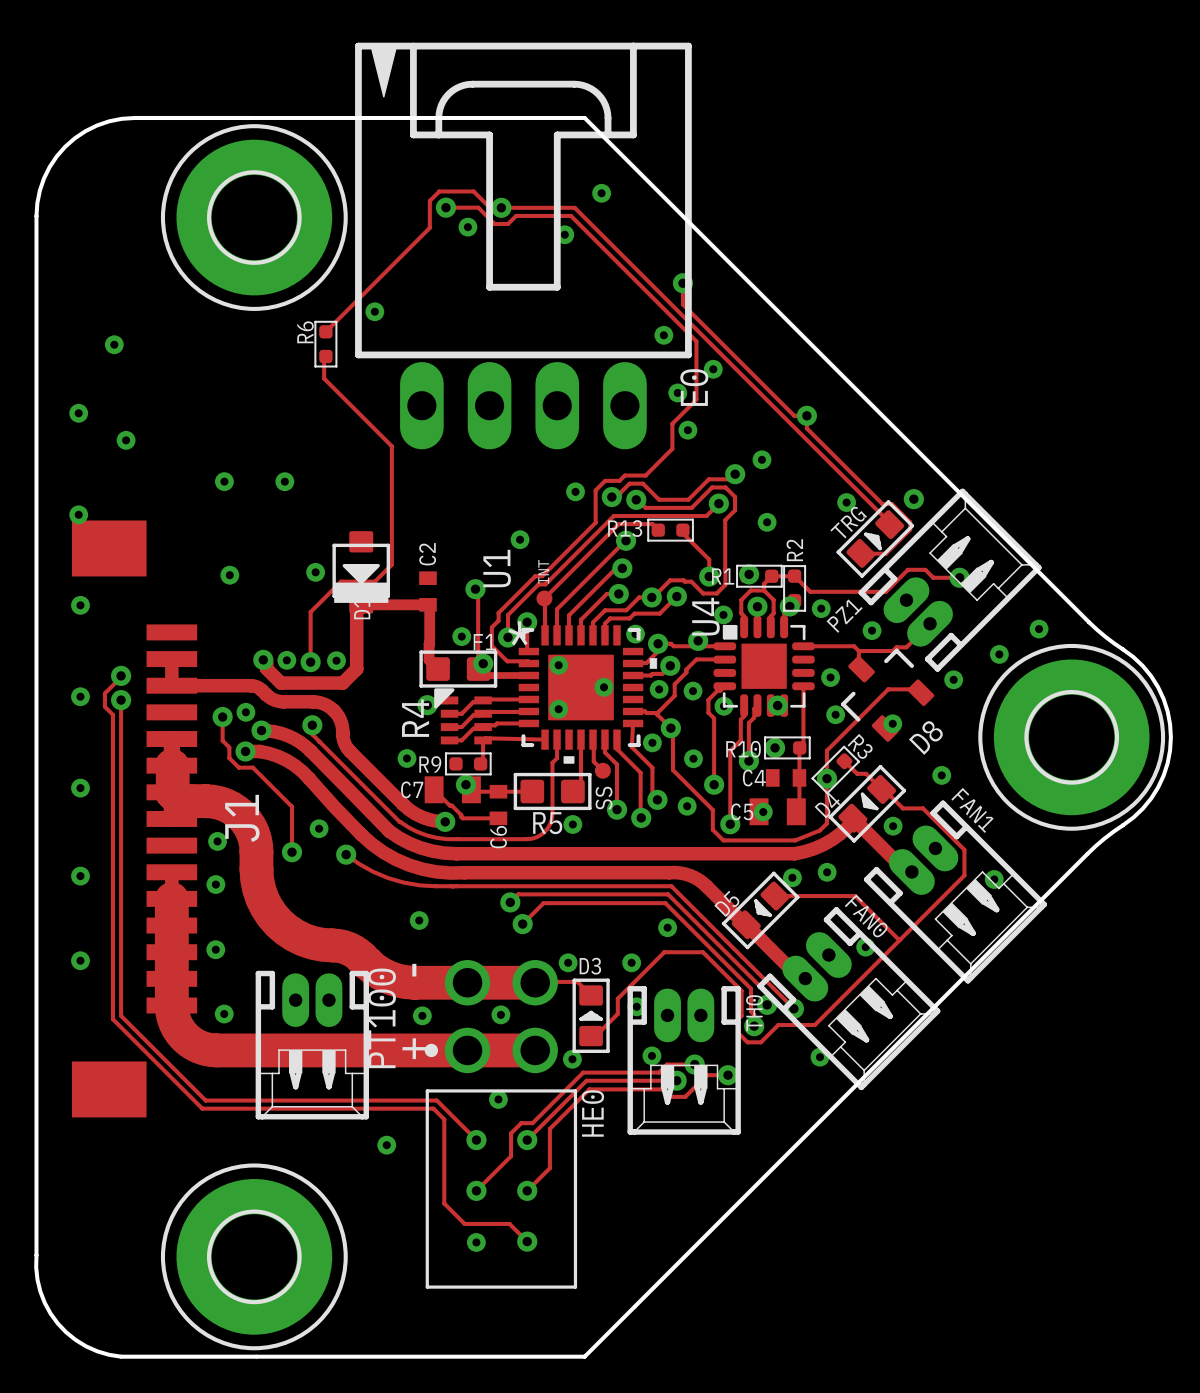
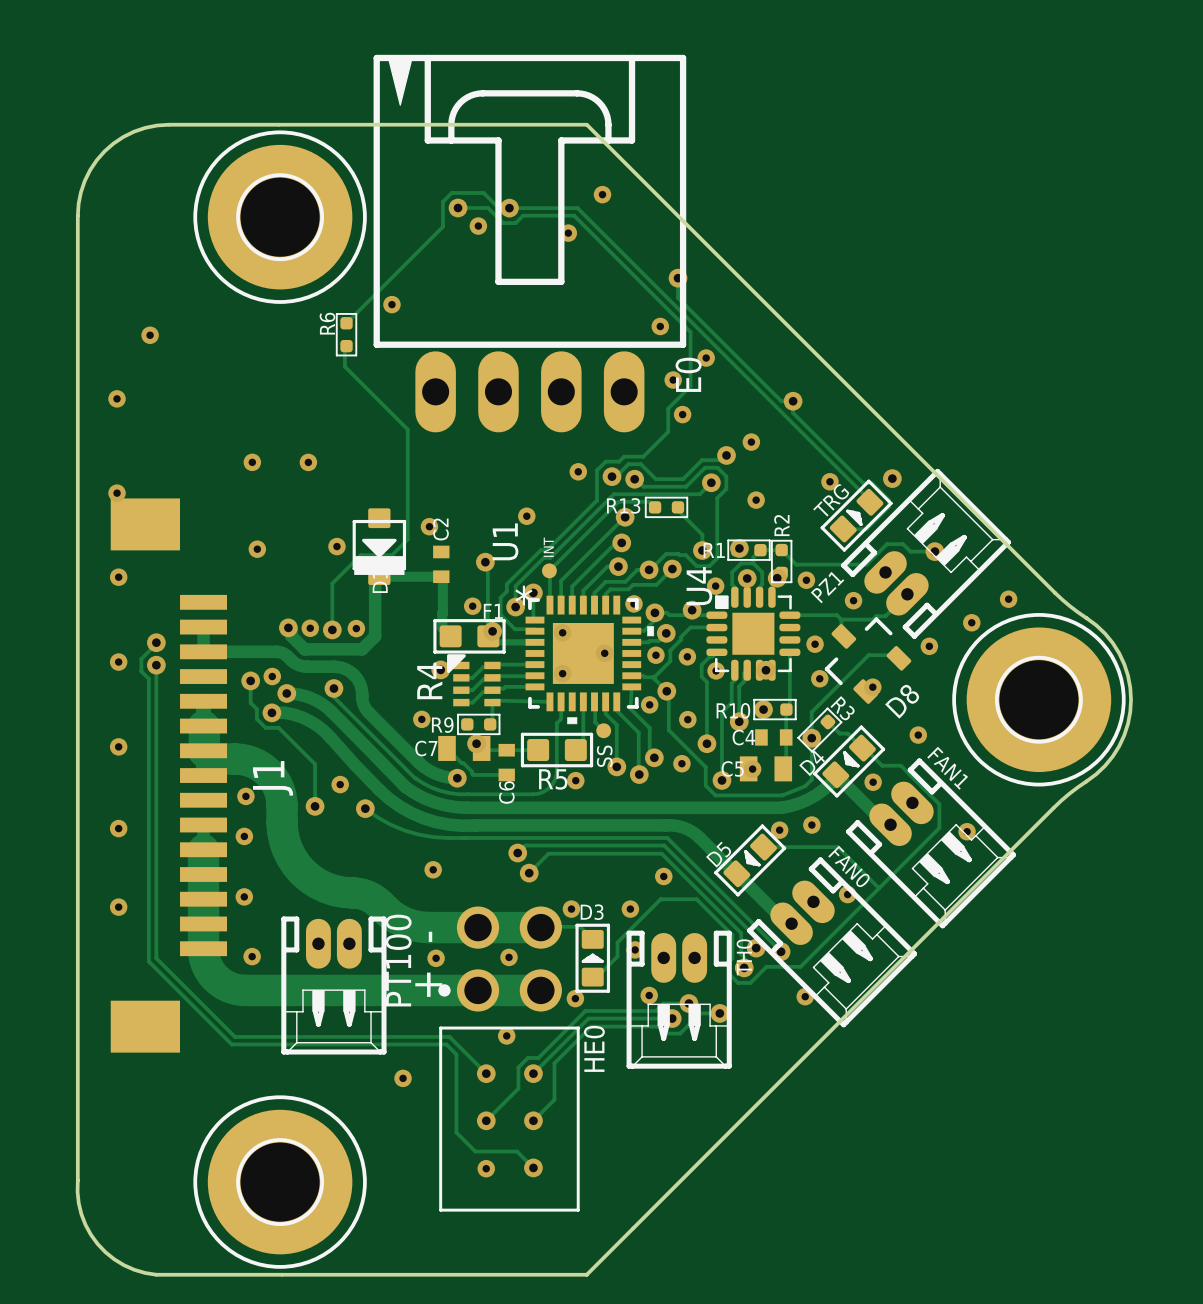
via: (126, 440) -> none
via: none -> (429, 526)

